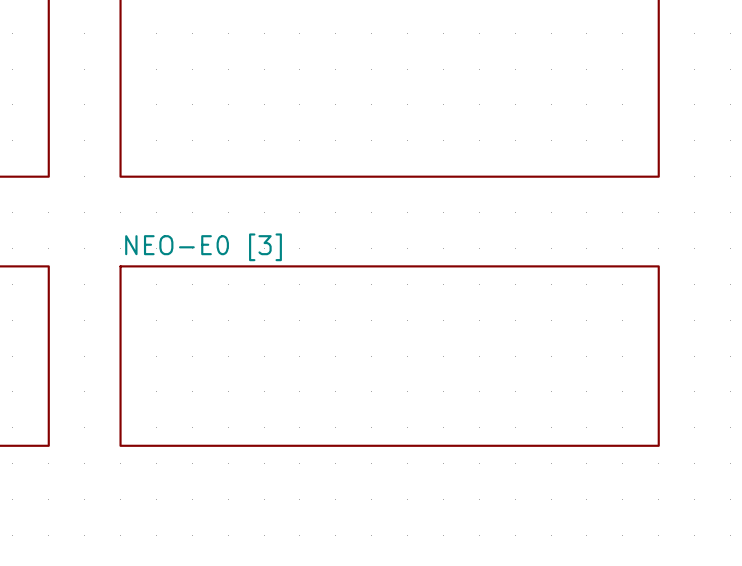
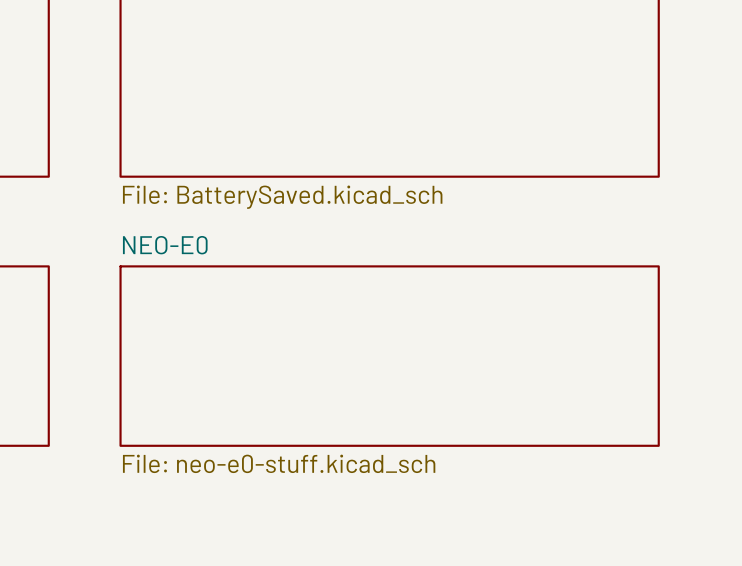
sheet value: none -> File: BatterySaved.kicad_sch (282, 197)
sheet NEO-E0 [3] name: NEO-E0 [3] (203, 247) -> NEO-E0 (165, 245)
sheet NEO-E0 [3] value: none -> File: neo-e0-stuff.kicad_sch (279, 463)

